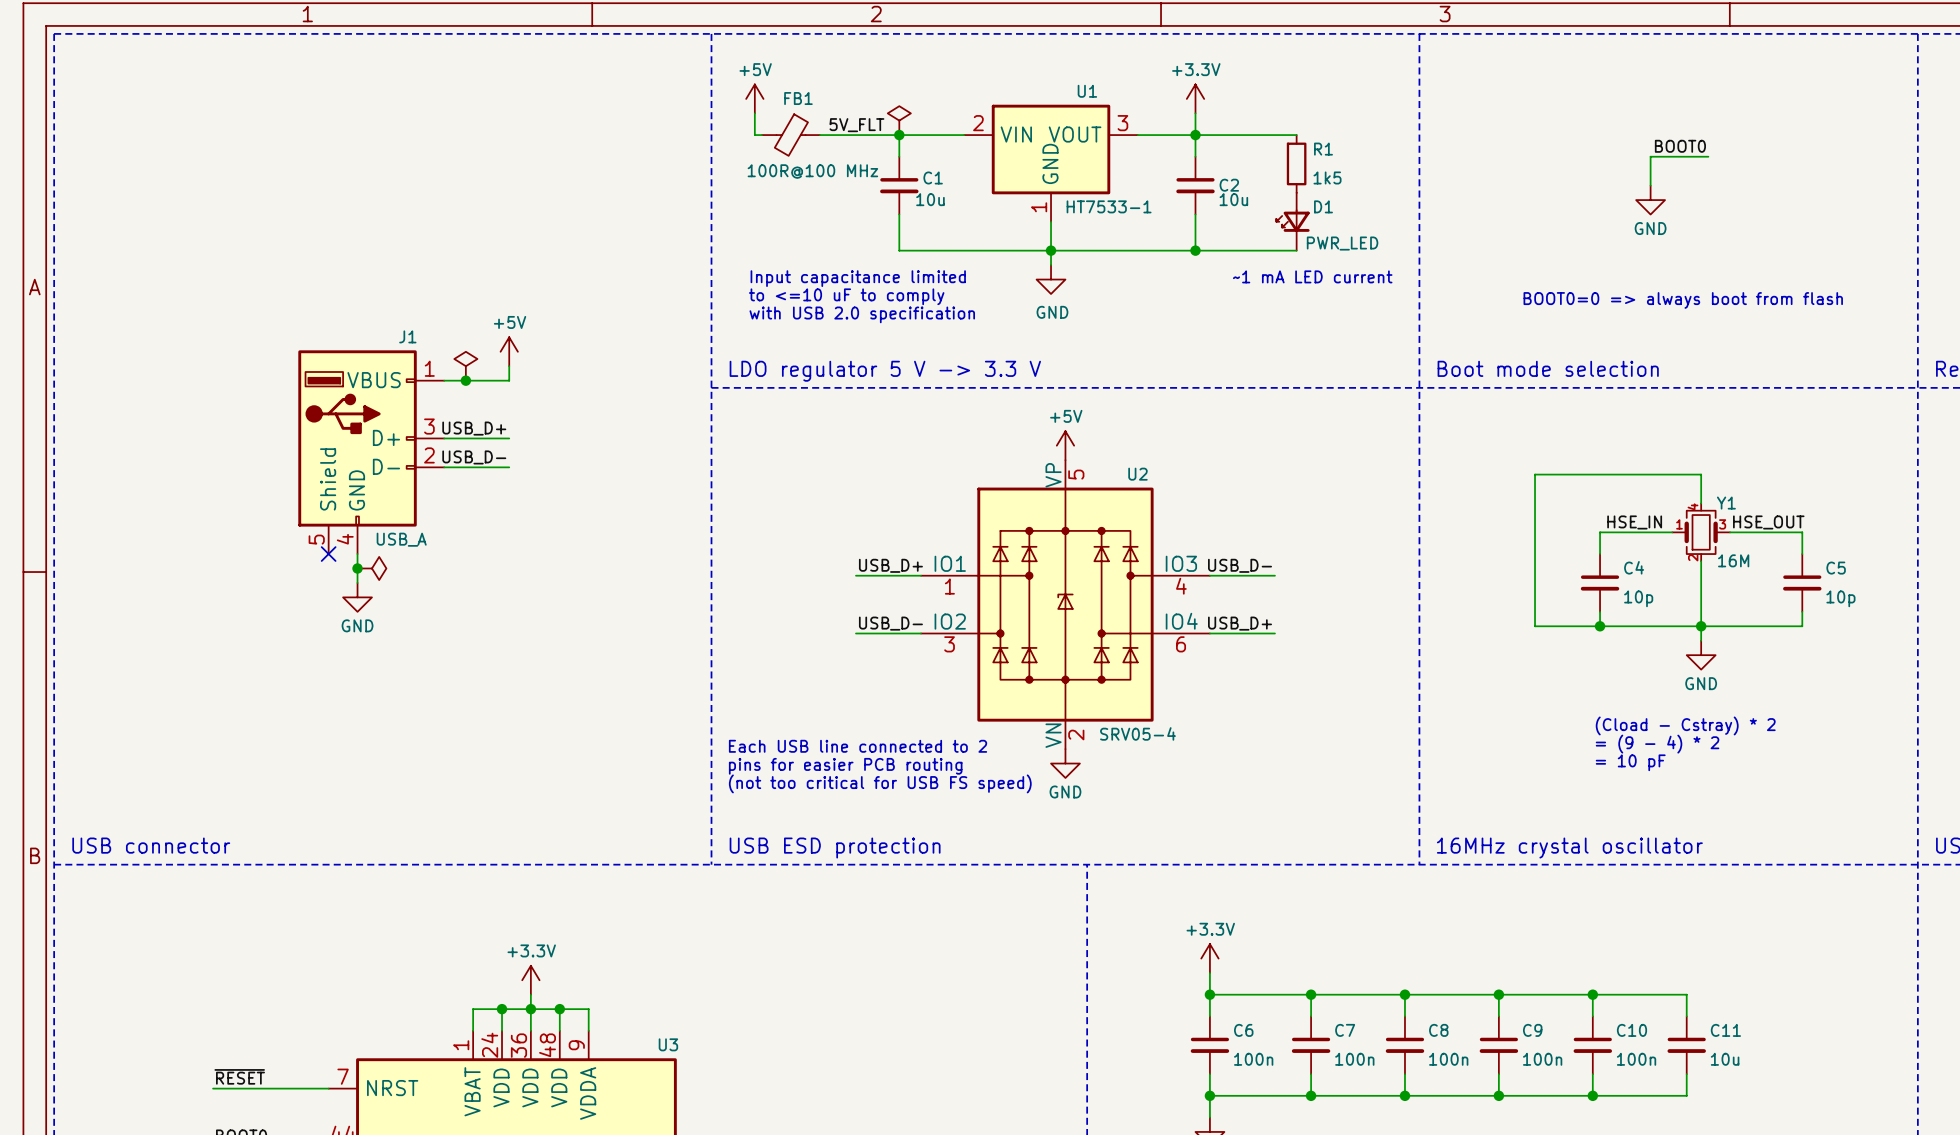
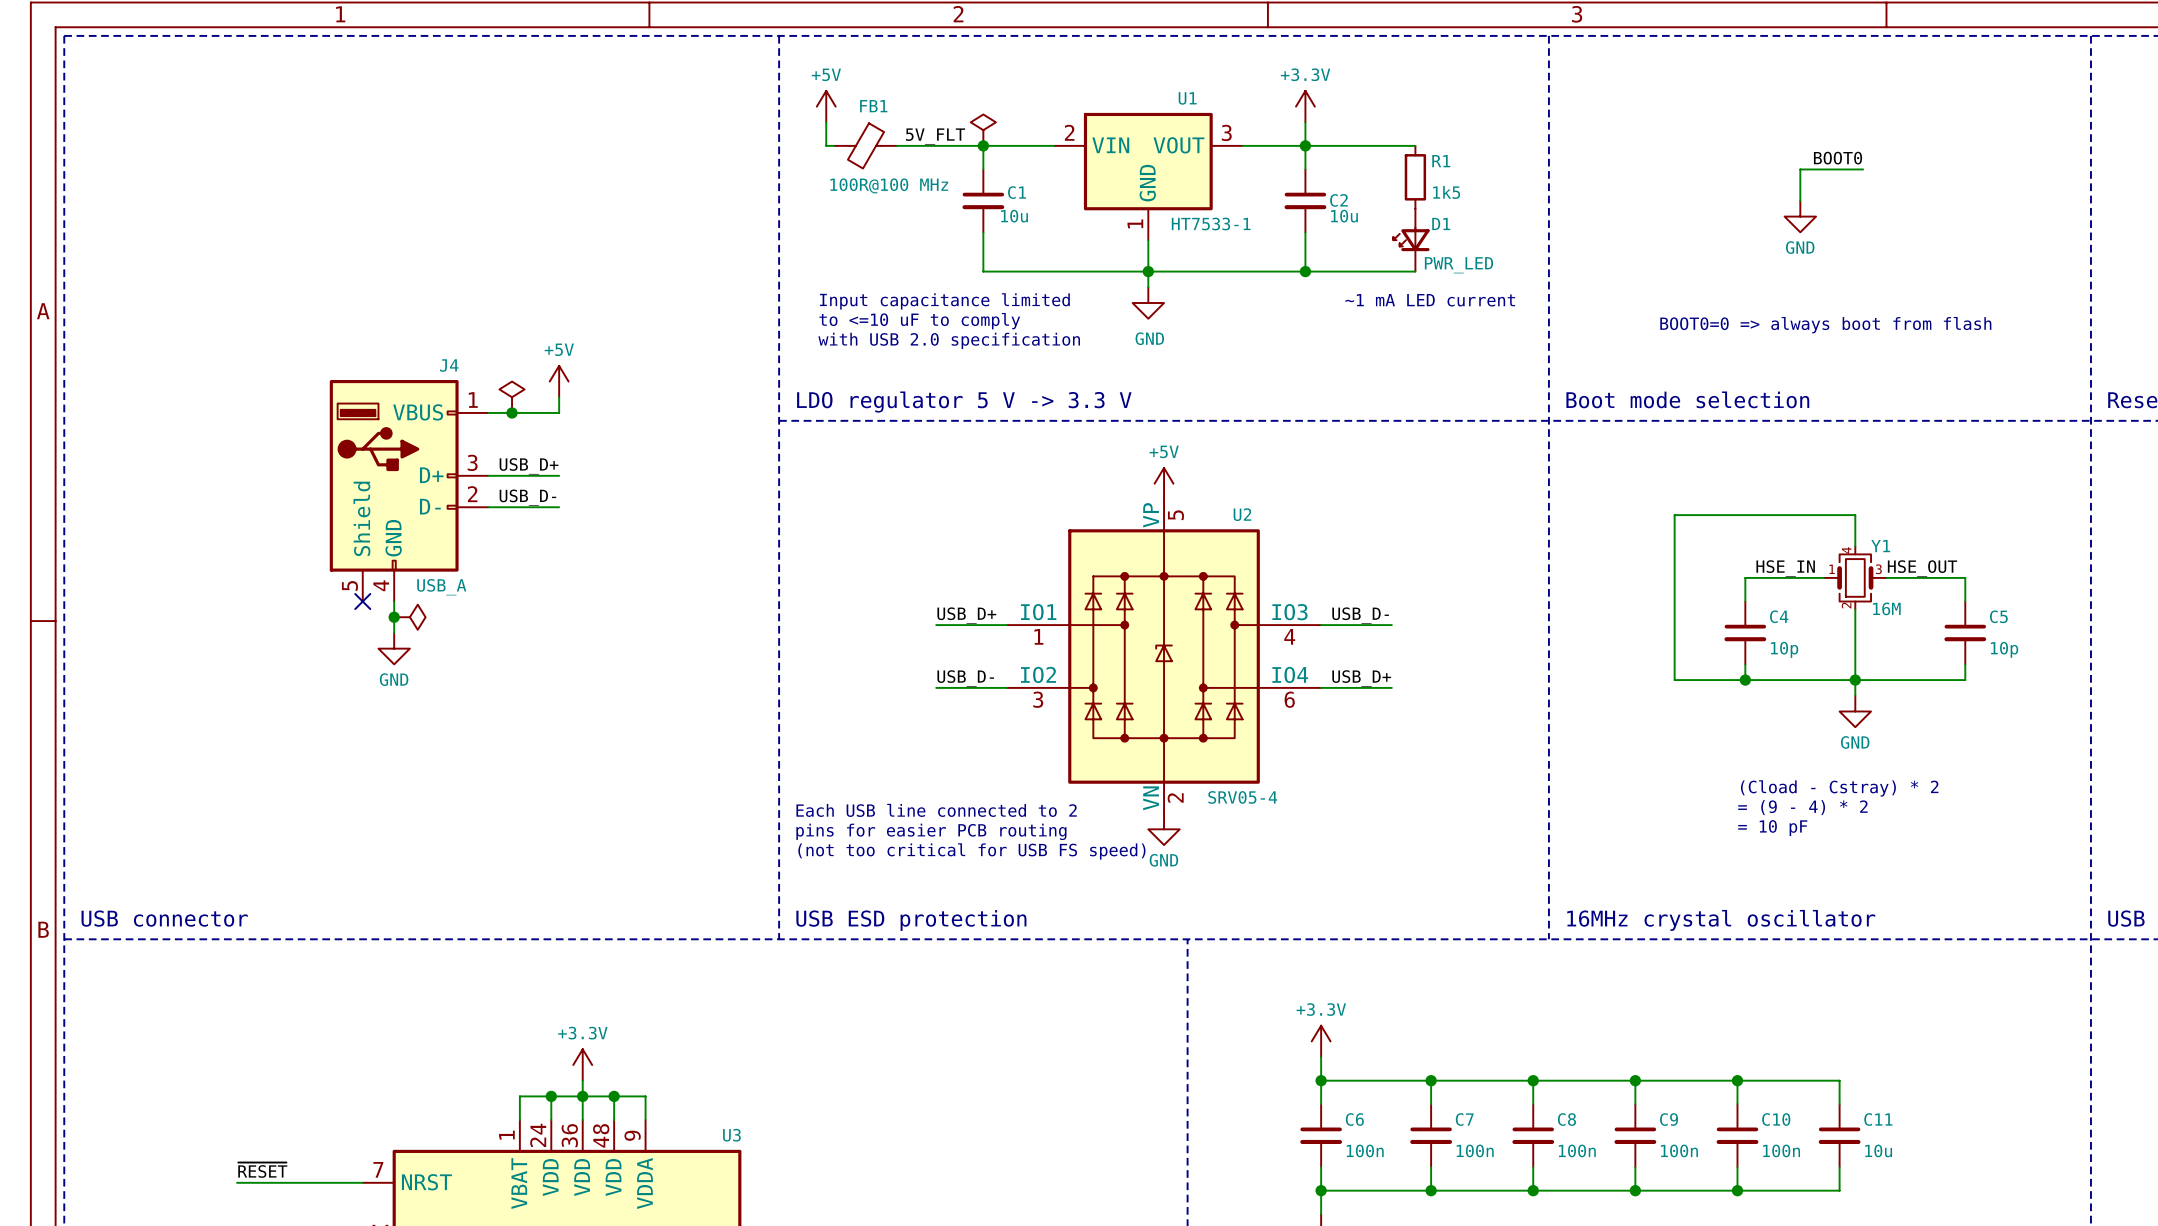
J1 name: J1 (407, 336) -> J4 (449, 365)

